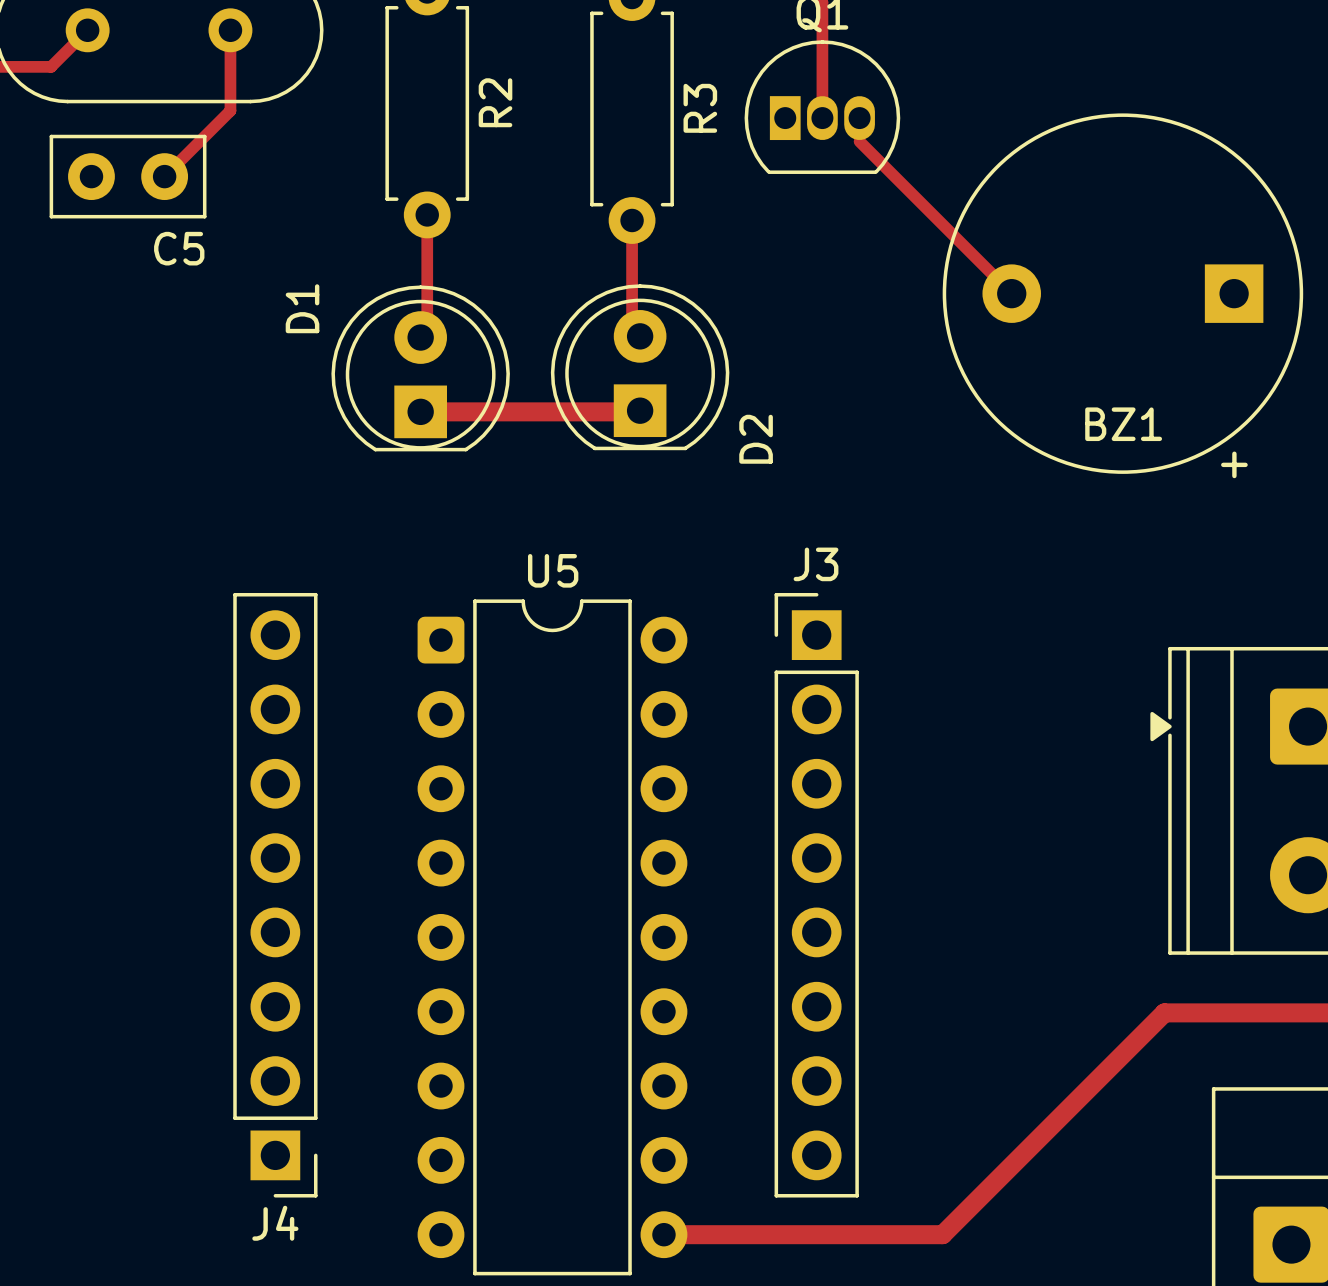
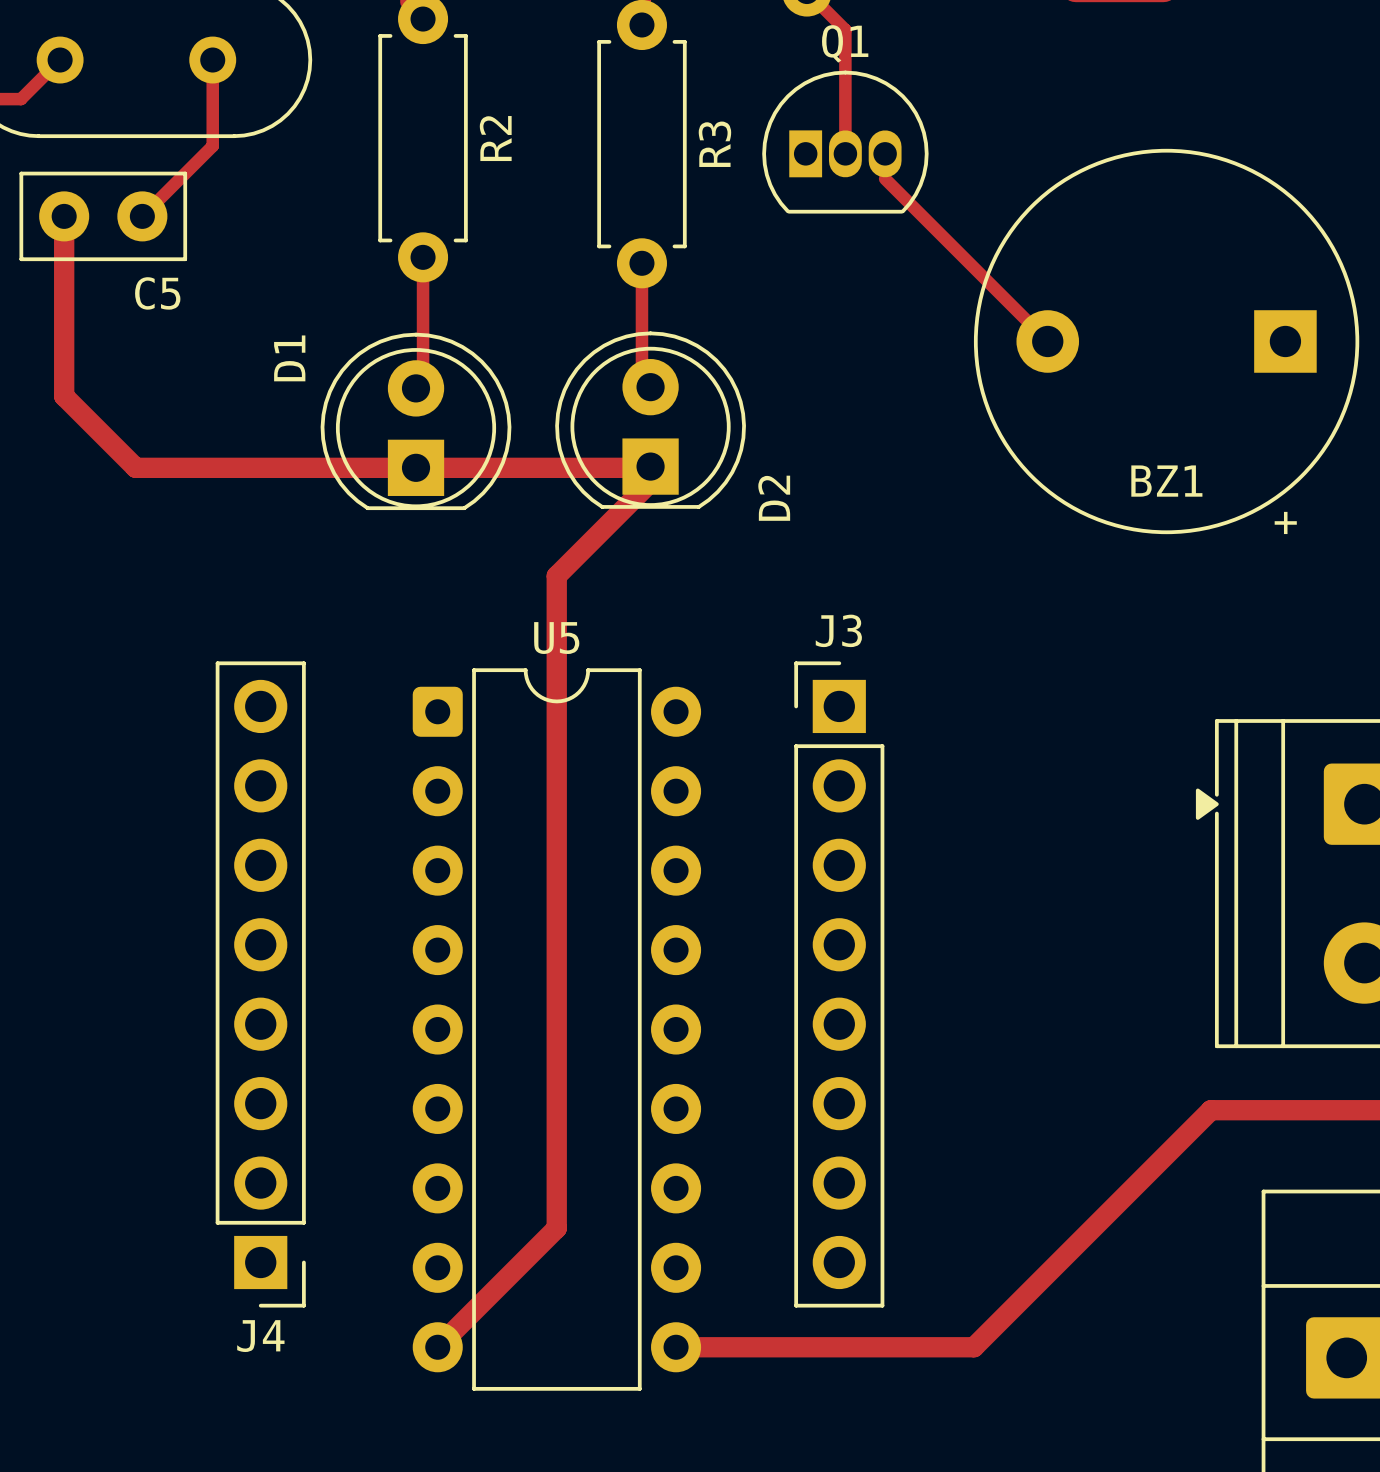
track: none -> (64, 216) (64, 396) (135, 467) (416, 467)
track: none -> (650, 482) (556, 576) (556, 1228) (437, 1347)

